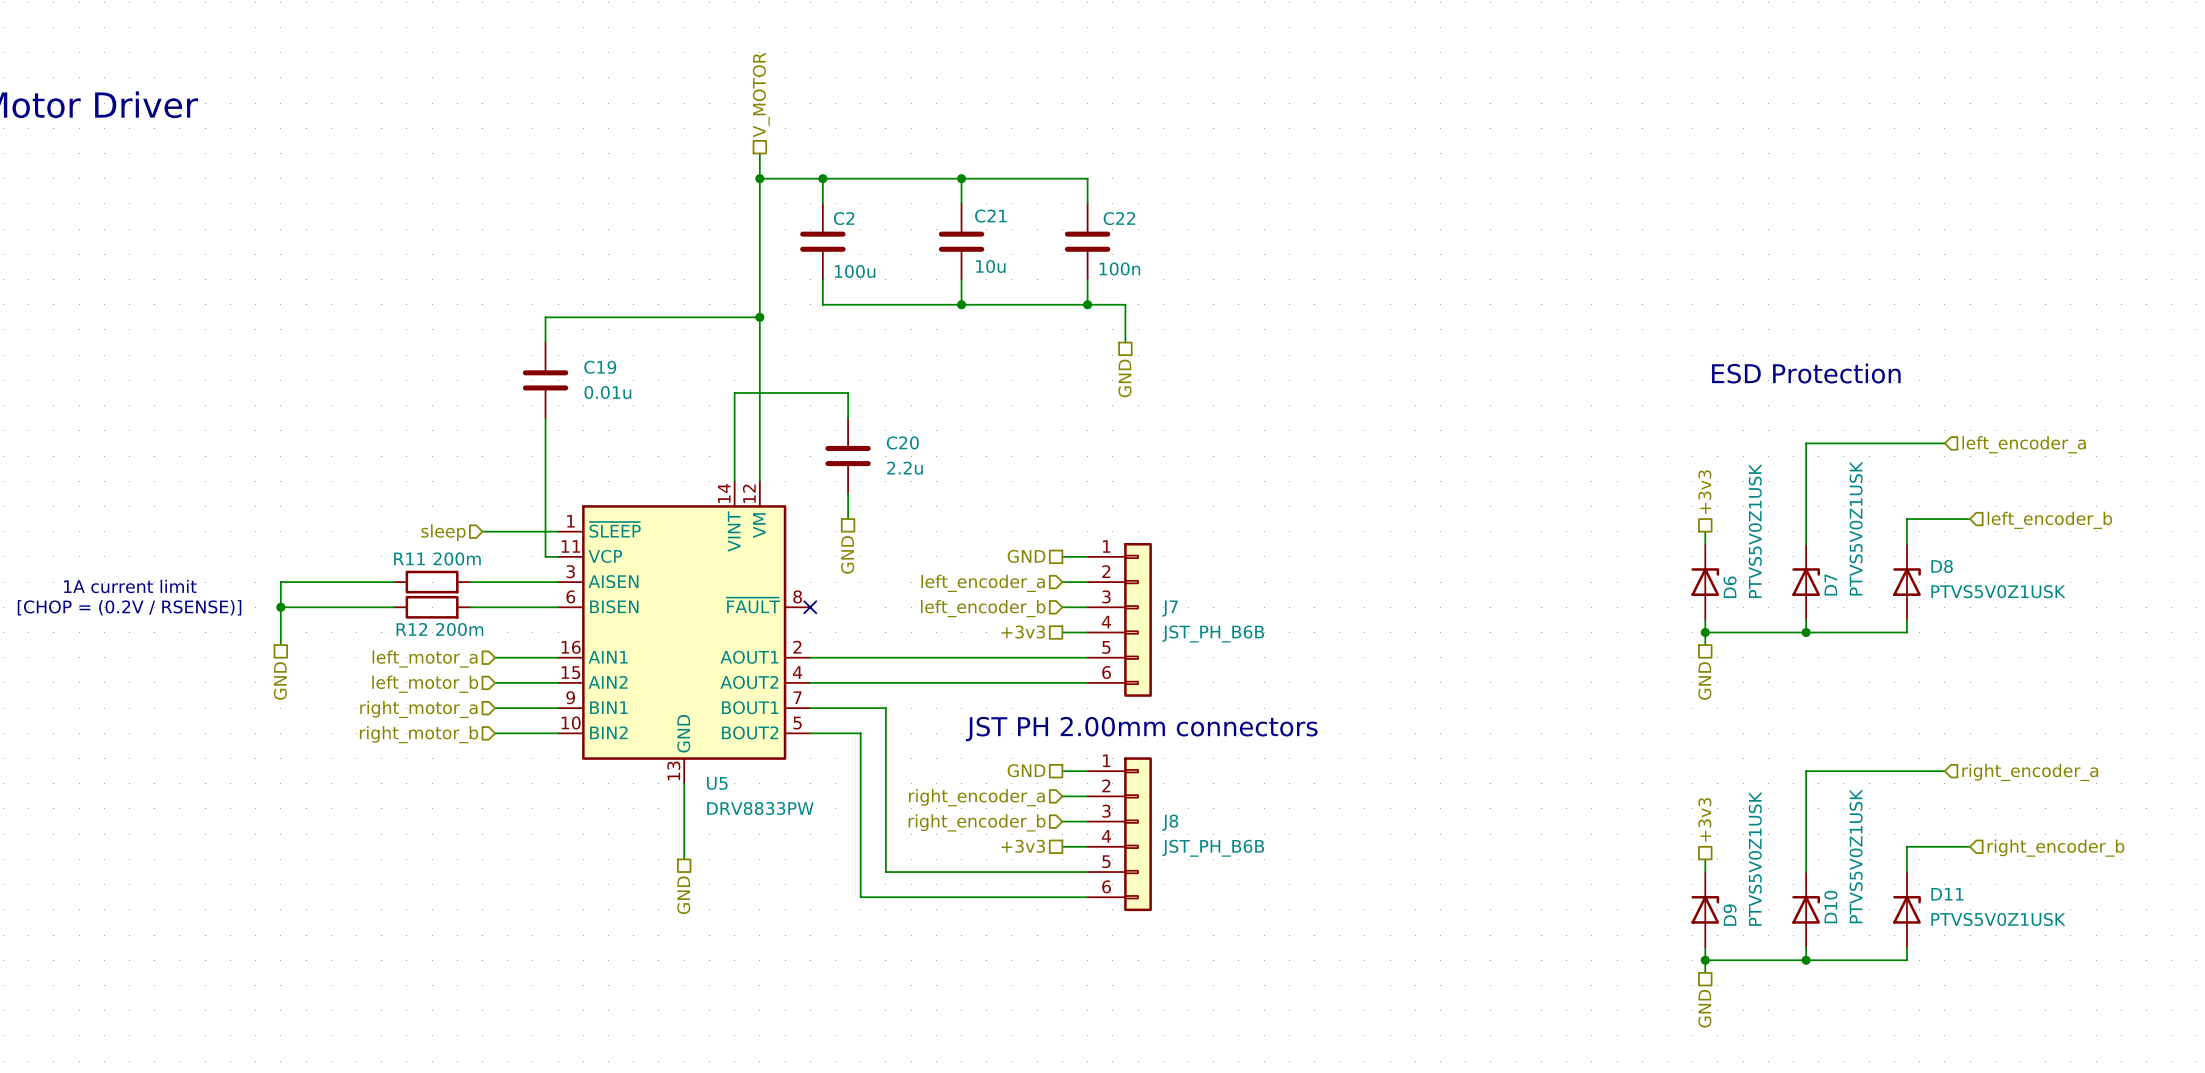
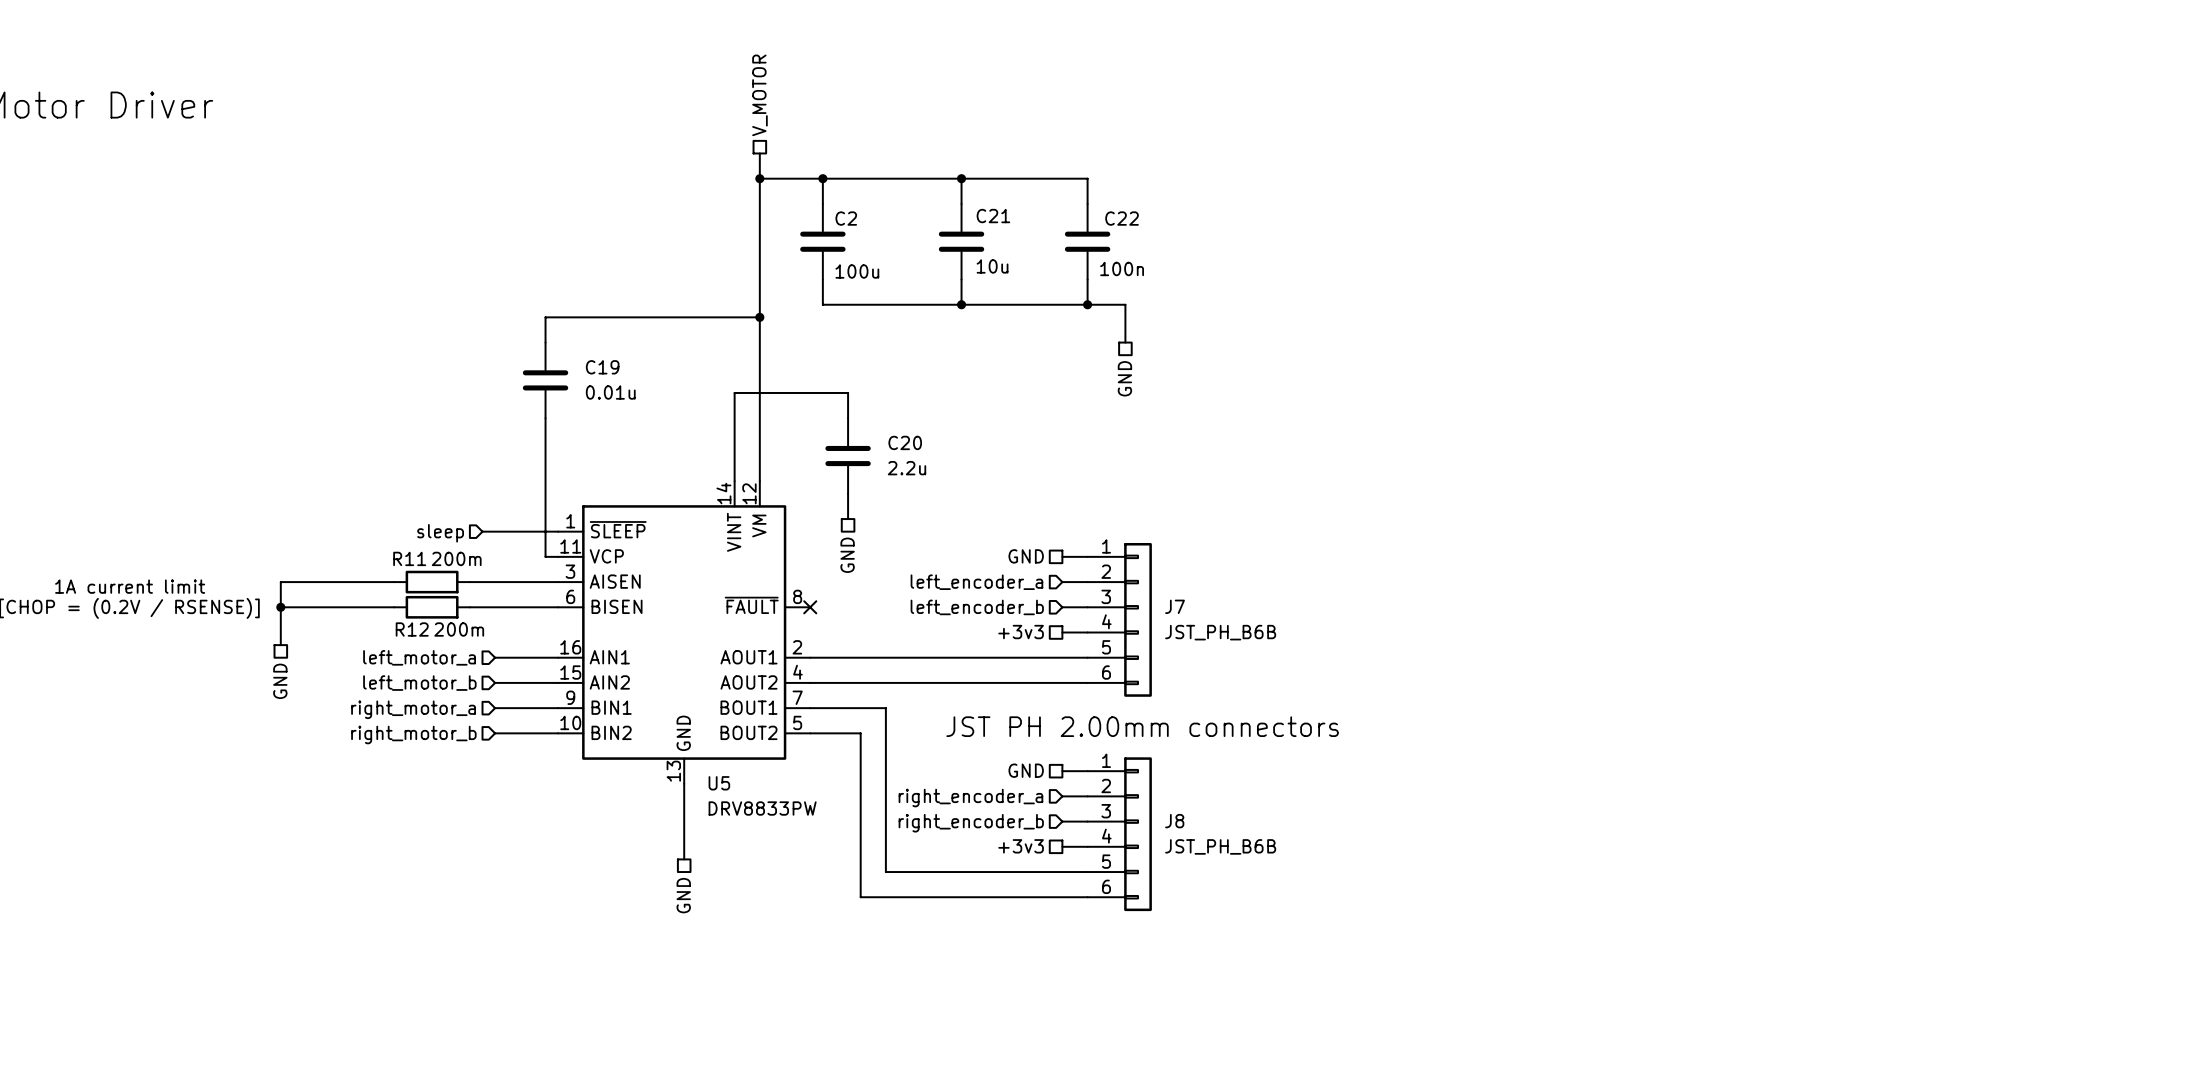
text: ESD Protection (1806, 373) -> none
wire: (1944, 443) (1806, 443) (1806, 544) -> none
hierarchical label: left_encoder_a (2024, 444) -> none
hierarchical label: +3v3 (1704, 492) -> none
wire: (1970, 519) (1906, 519) (1906, 544) -> none
hierarchical label: left_encoder_b (2049, 520) -> none
wire: (1705, 531) (1705, 544) -> none
D6: PTVS5V0Z1USK (1705, 582) -> none
D7: PTVS5V0Z1USK (1806, 582) -> none
D8: PTVS5V0Z1USK (1906, 582) -> none
wire: (1705, 619) (1705, 645) -> none
wire: (1806, 619) (1806, 632) -> none
wire: (1906, 619) (1906, 632) (1705, 632) -> none
junction: (1705, 632) -> none
junction: (1806, 632) -> none
hierarchical label: GND (1704, 680) -> none
wire: (1944, 771) (1806, 771) (1806, 872) -> none
hierarchical label: right_encoder_a (2030, 772) -> none
hierarchical label: +3v3 (1704, 819) -> none
wire: (1970, 846) (1906, 846) (1906, 872) -> none
hierarchical label: right_encoder_b (2055, 848) -> none
wire: (1705, 859) (1705, 872) -> none
D9: PTVS5V0Z1USK (1705, 909) -> none
D10: PTVS5V0Z1USK (1806, 909) -> none
D11: PTVS5V0Z1USK (1906, 909) -> none
wire: (1705, 947) (1705, 972) -> none
wire: (1806, 947) (1806, 960) -> none
wire: (1906, 947) (1906, 960) (1705, 960) -> none
junction: (1705, 960) -> none
junction: (1806, 960) -> none
hierarchical label: GND (1704, 1008) -> none

